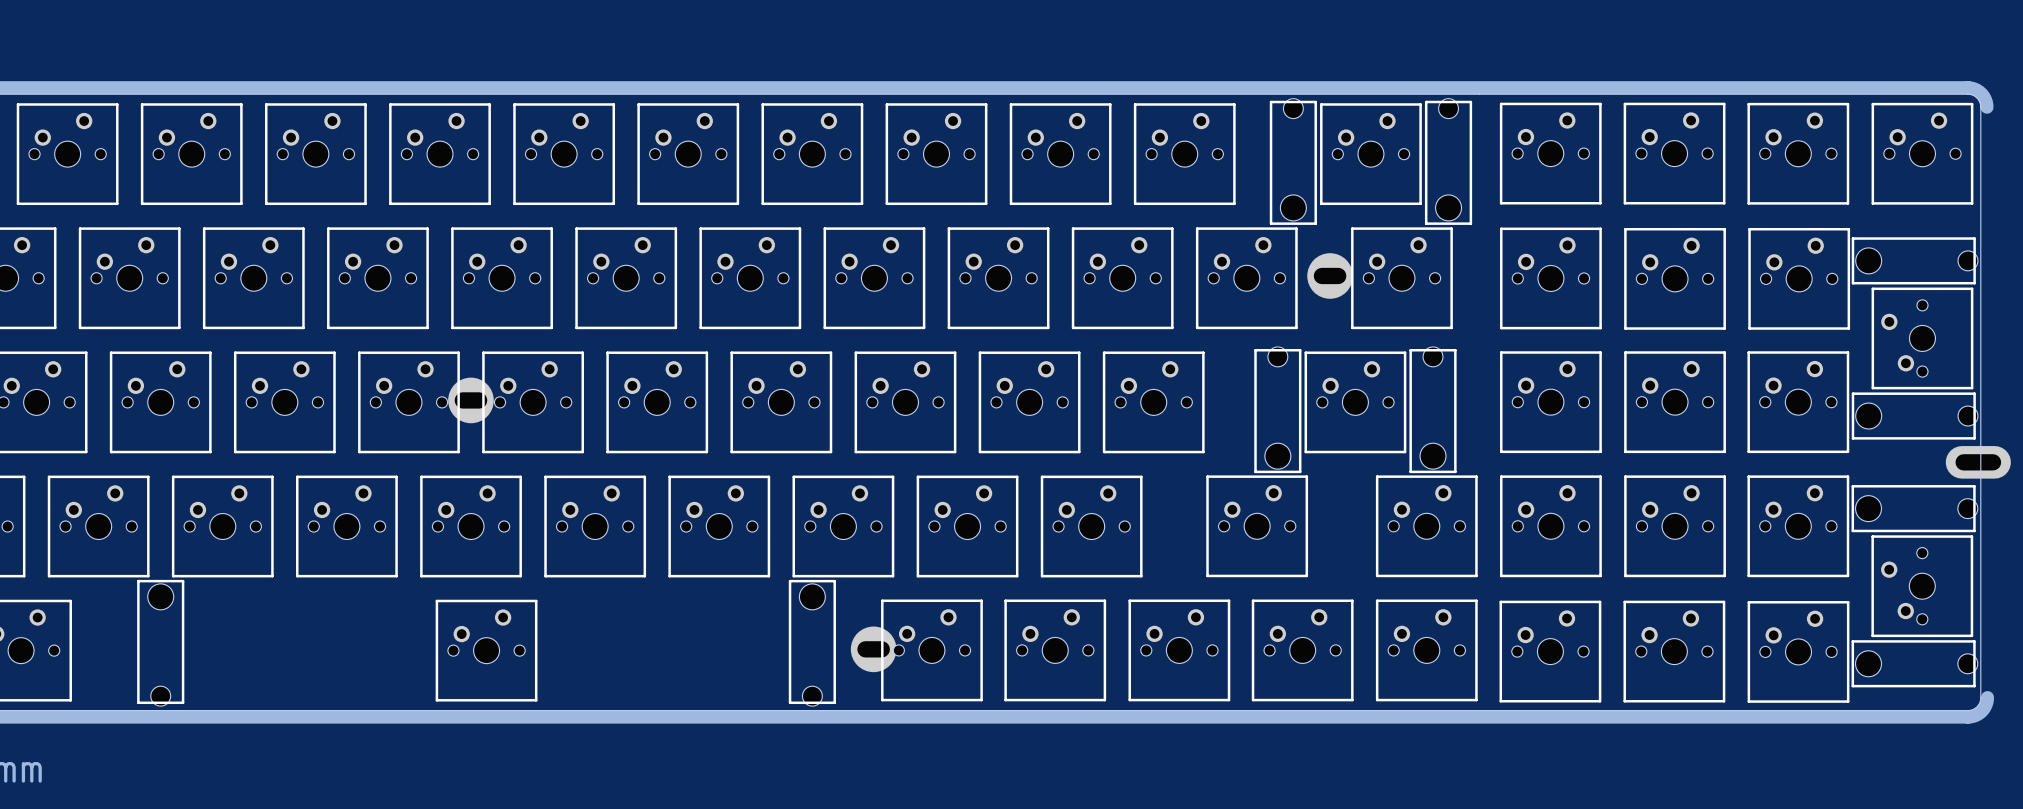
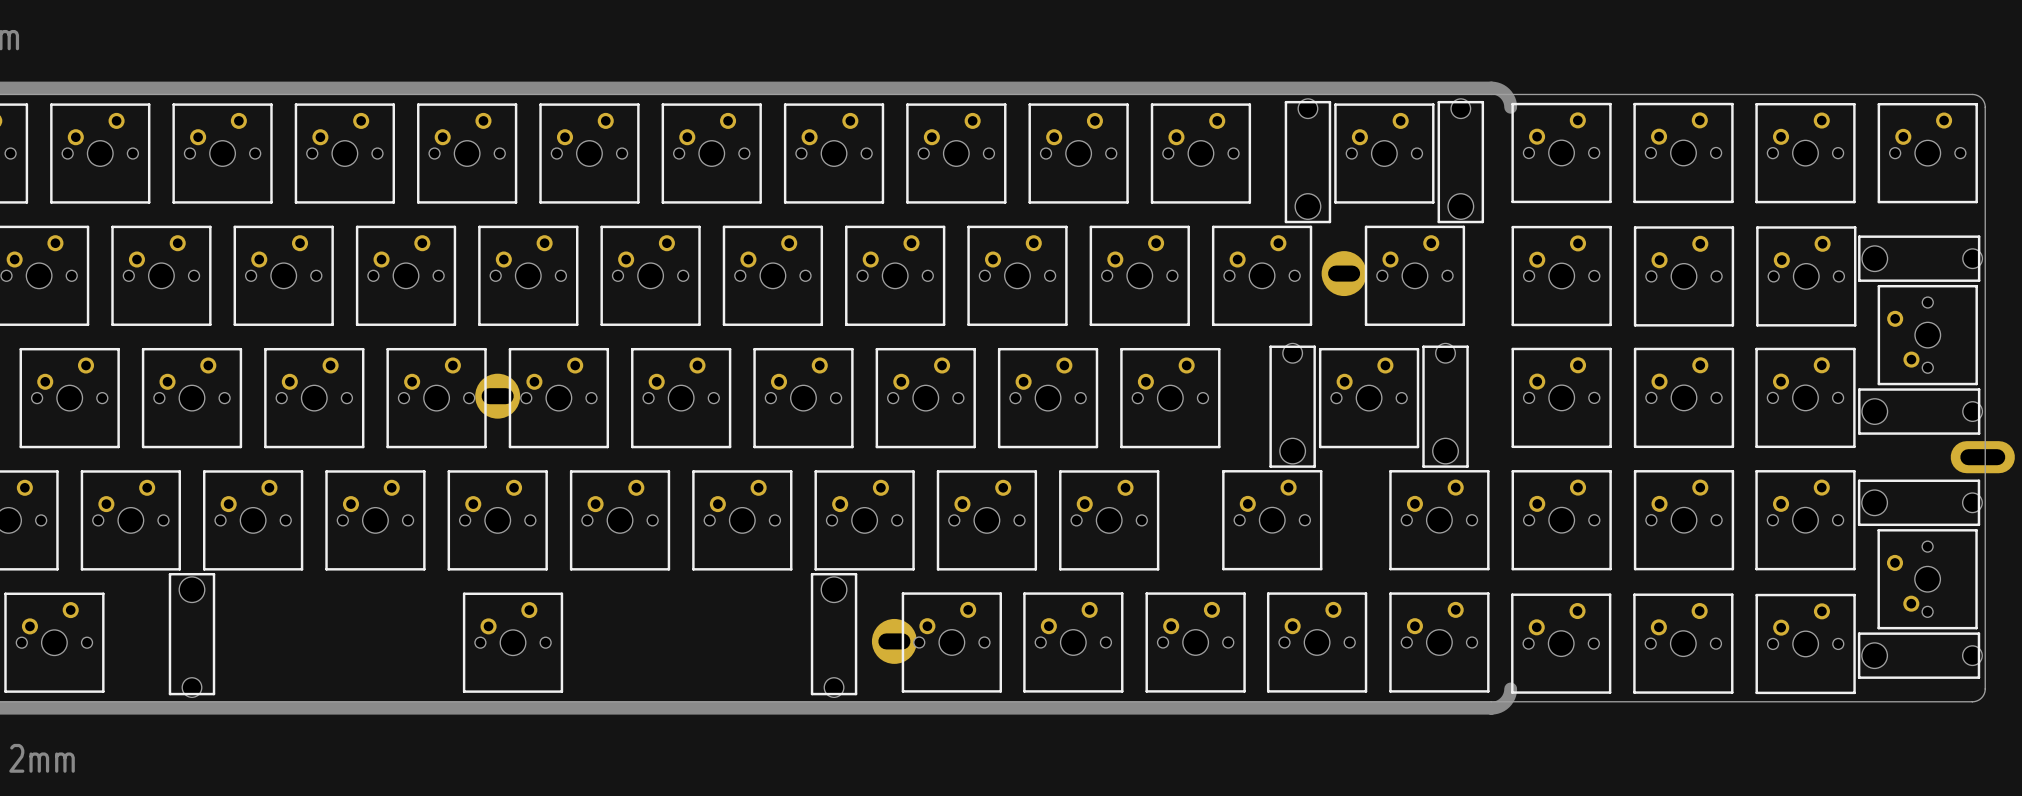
line: (1479, 87) (1967, 87) -> (1491, 88) (1505, 93) (1510, 107)
line: (1967, 87) (1981, 93) (1987, 107) -> none
line: (1987, 697) (1981, 711) (1967, 717) (1479, 717) -> (1510, 688) (1505, 702) (1491, 708)

